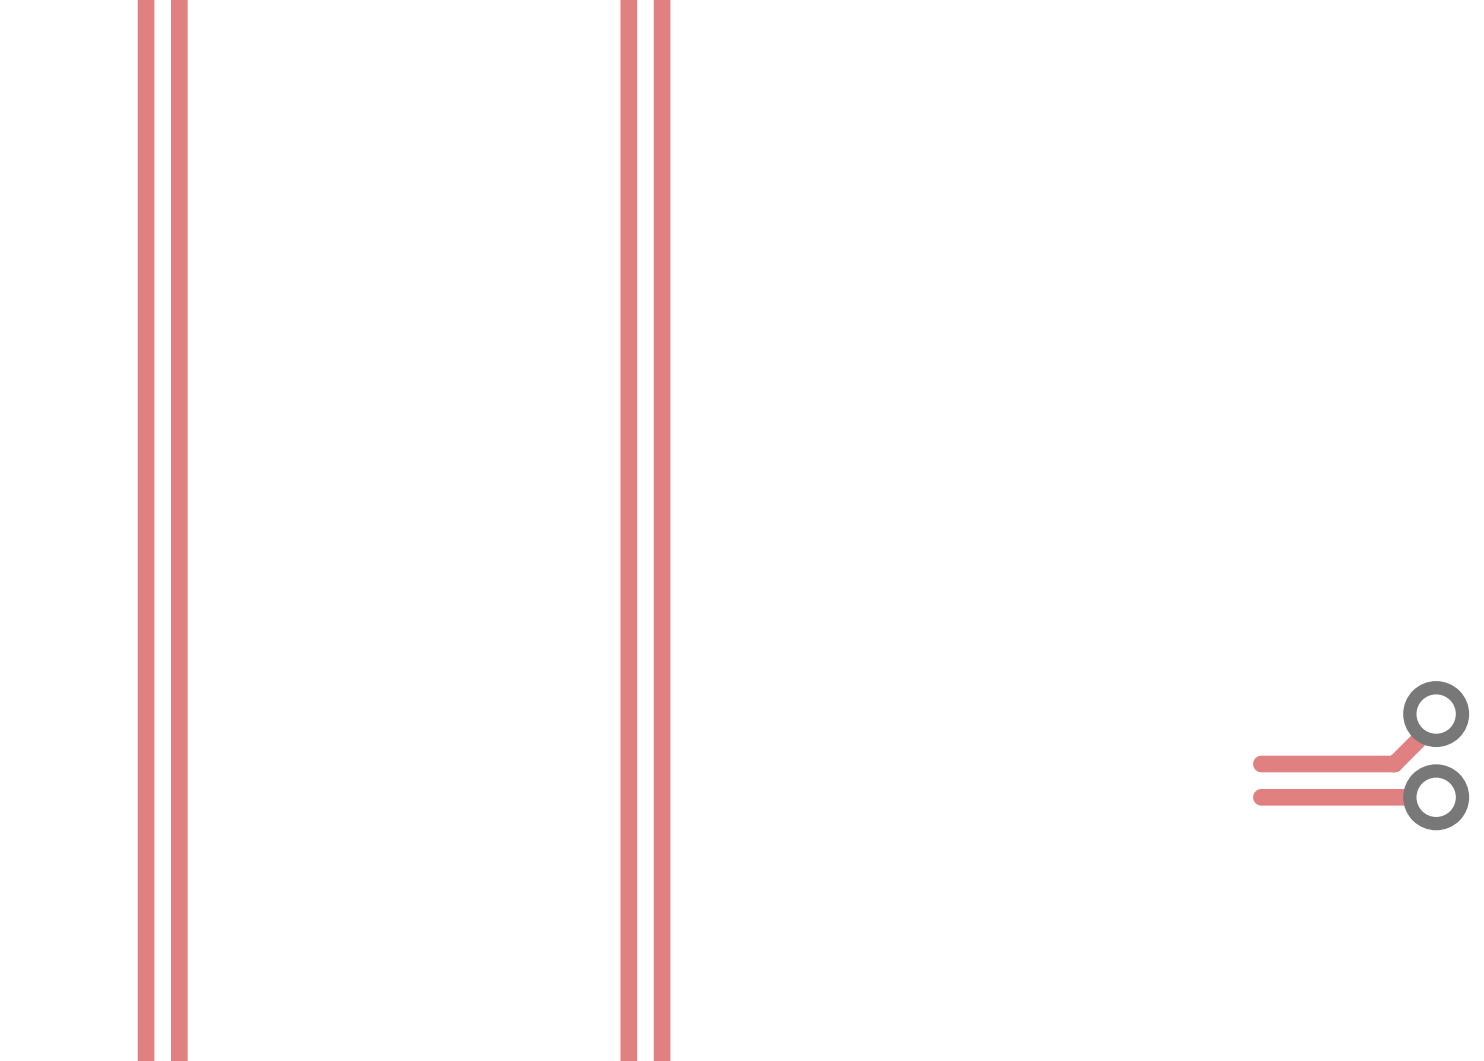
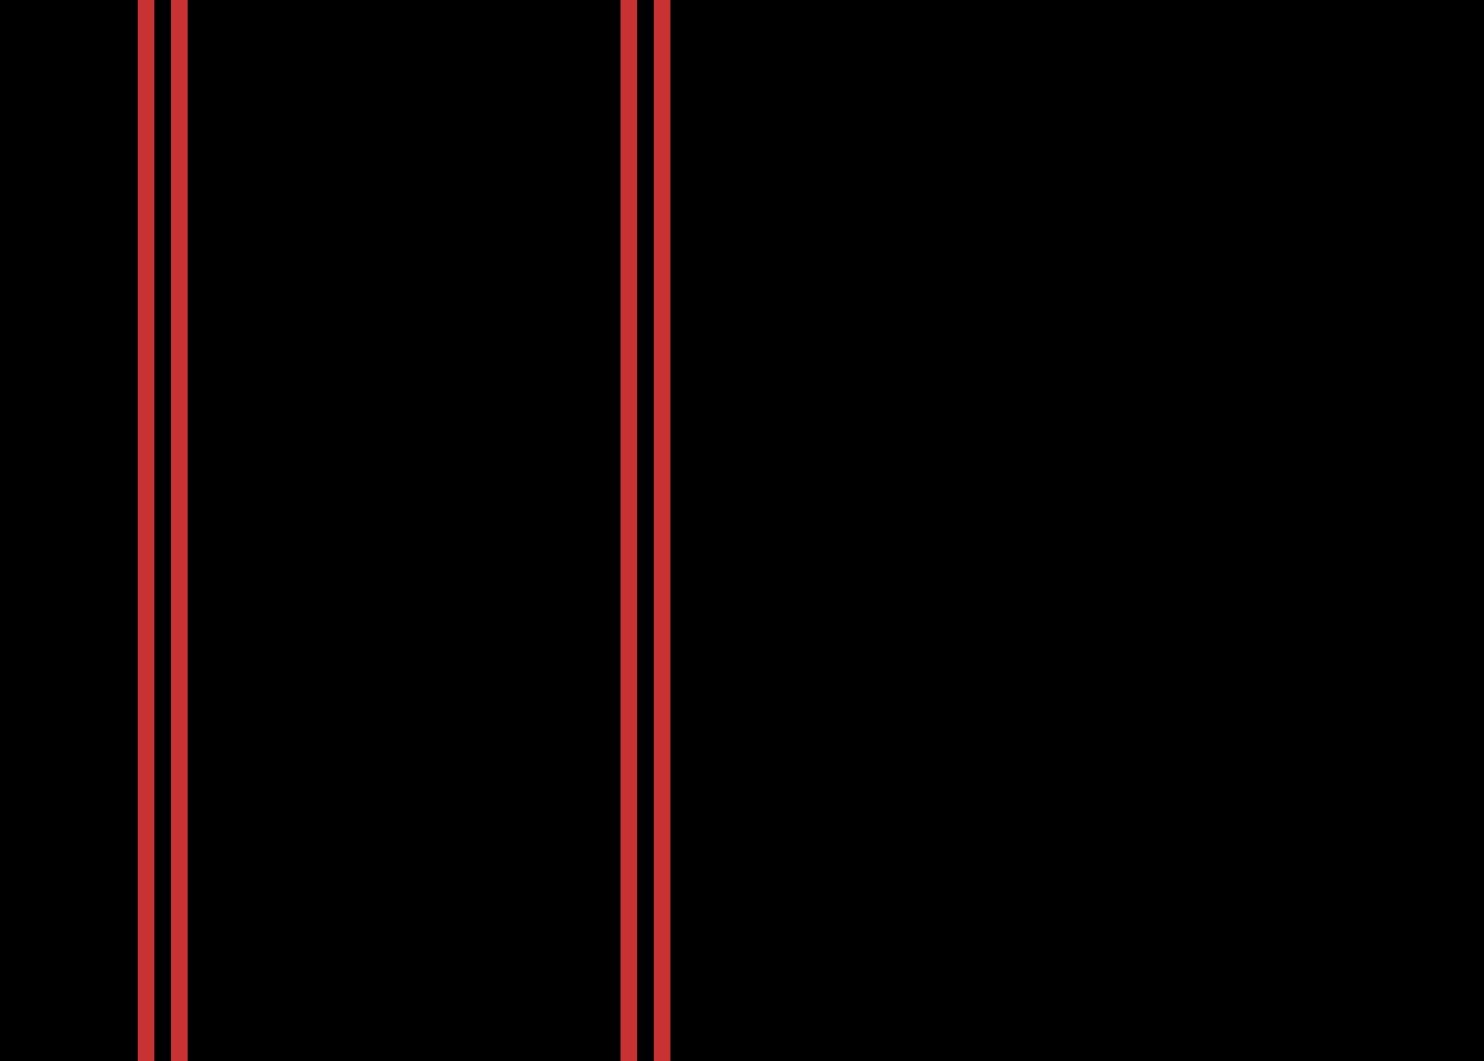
track: (1436, 714) (1436, 722) (1394, 764) (1261, 764) -> none
via: (1436, 714) -> none
track: (1261, 797) (1436, 797) -> none
via: (1436, 797) -> none

